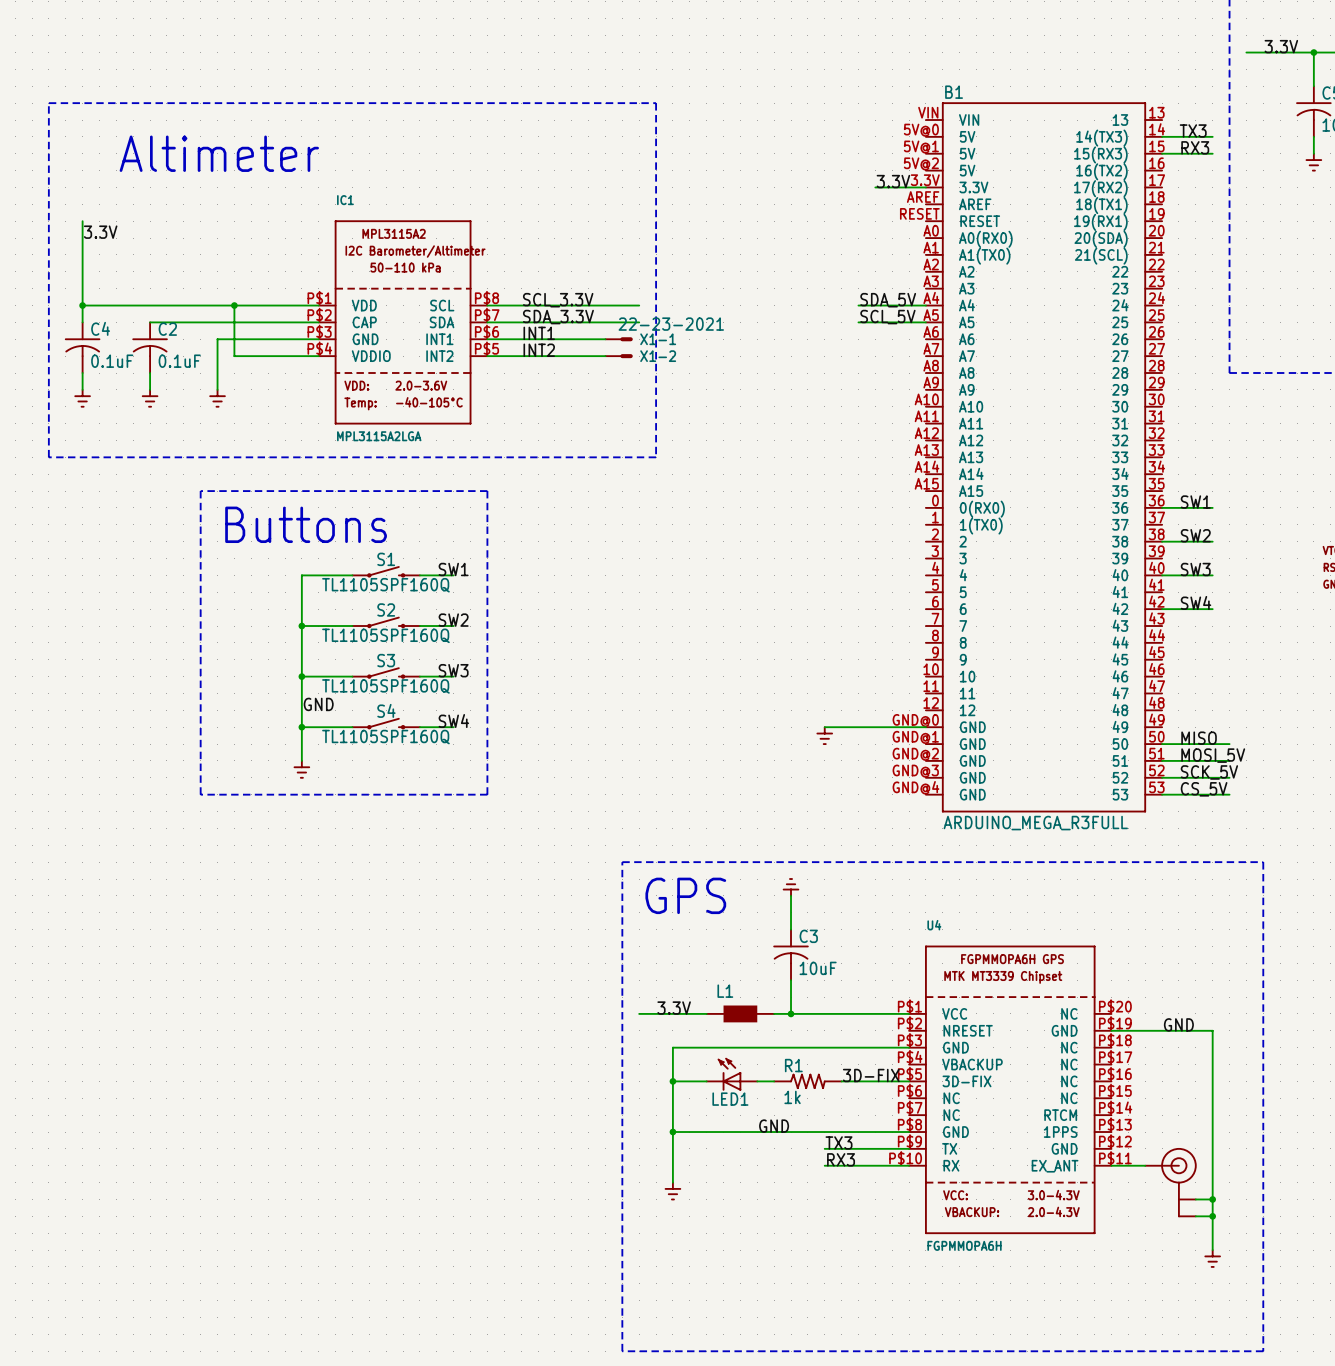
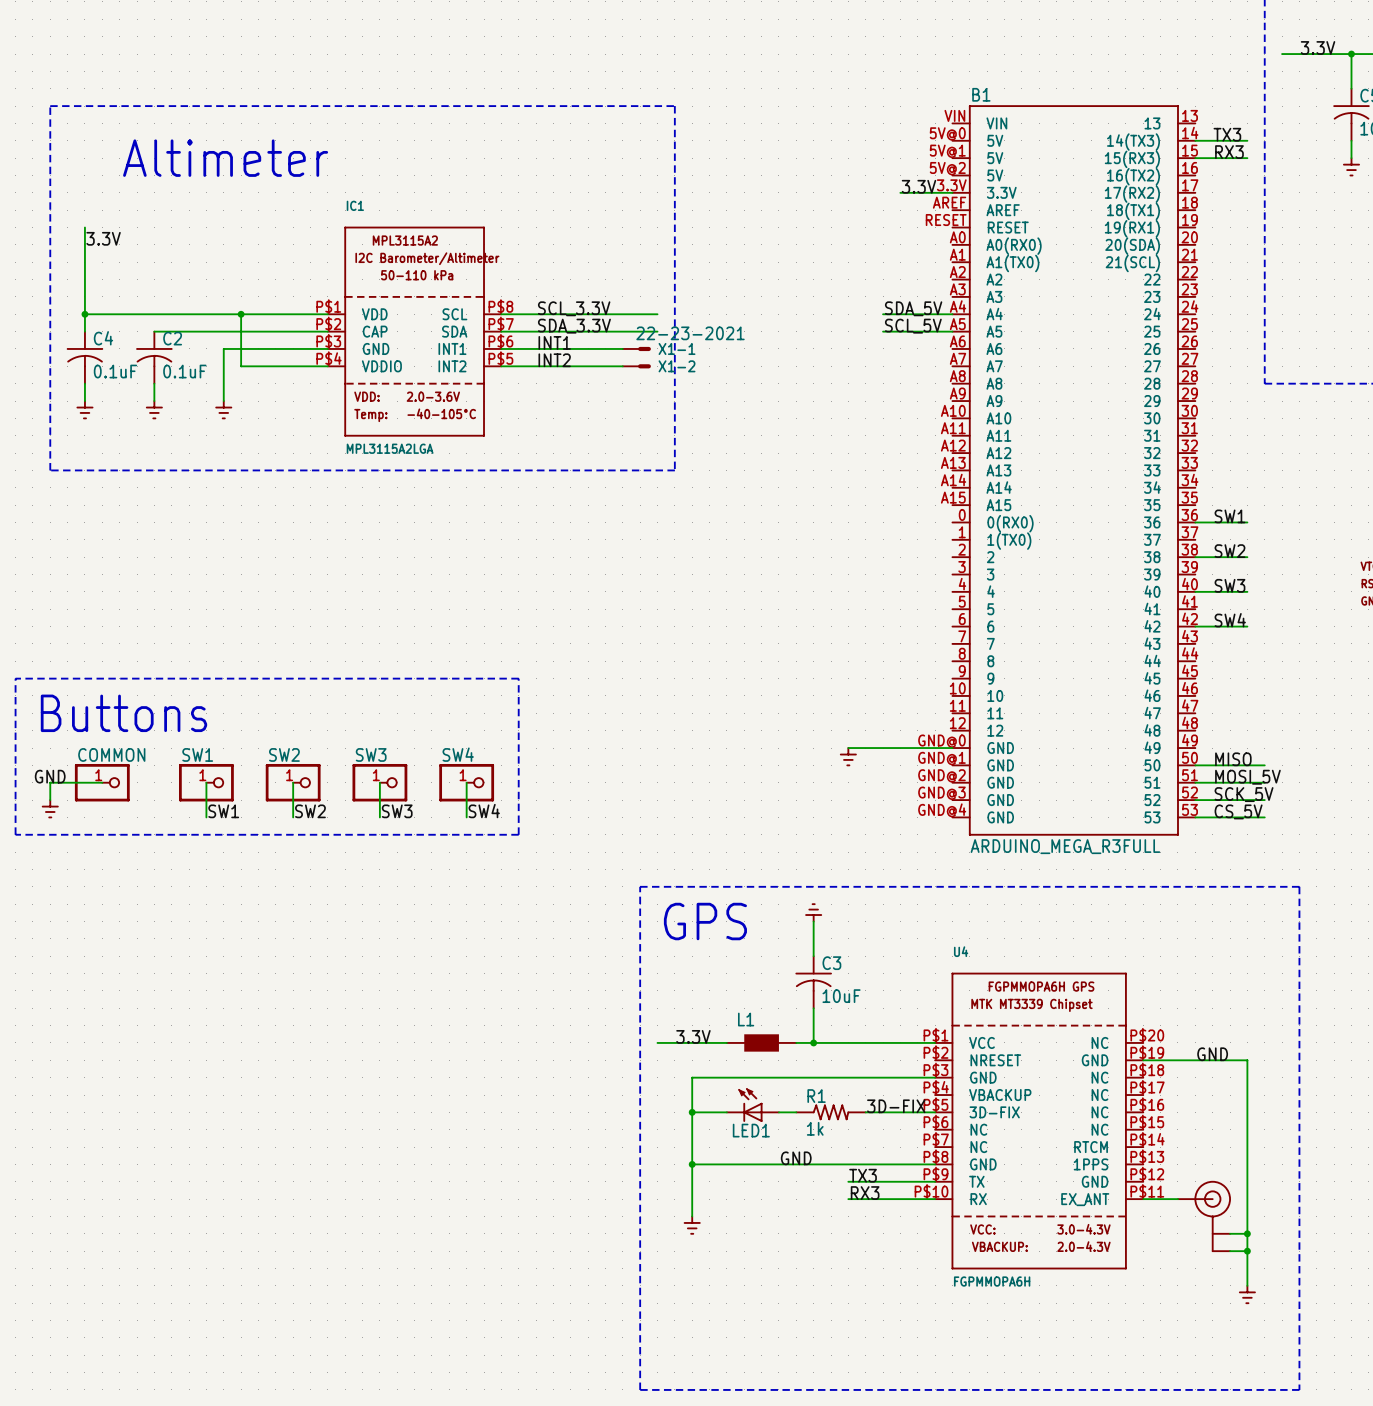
line: (200, 491) (487, 491) (487, 794) (200, 794) (200, 491) -> none
text: Buttons (306, 524) -> none
label: SW1 (453, 569) -> none
S1: TL1105SPF160Q (386, 571) -> none
wire: (352, 575) (301, 575) (301, 760) -> none
wire: (419, 575) (453, 575) -> none
label: SW2 (453, 620) -> none
S2: TL1105SPF160Q (386, 622) -> none
wire: (301, 626) (352, 626) -> none
junction: (301, 626) -> none
wire: (419, 626) (453, 626) -> none
line: none -> (15, 678) (518, 678) (518, 834) (15, 834) (15, 678)
label position: SW3 (453, 670) -> SW3 (397, 811)
S3: TL1105SPF160Q (386, 673) -> none
wire: (301, 676) (352, 676) -> none
junction: (301, 676) -> none
wire: (419, 676) (453, 676) -> none
text: none -> Buttons (123, 713)
label: GND (318, 704) -> none
label position: SW4 (453, 721) -> SW4 (484, 811)
S4: TL1105SPF160Q (386, 723) -> none
wire: (301, 727) (352, 727) -> none
junction: (301, 727) -> none
wire: (419, 727) (453, 727) -> none
label: none -> GND (50, 776)
wire: none -> (102, 782) (50, 782) (50, 800)
COMMON: none -> (102, 782)
SW1: none -> (206, 782)
wire: none -> (293, 782) (293, 817)
SW2: none -> (293, 782)
wire: none -> (379, 782) (379, 817)
SW3: none -> (379, 782)
wire: none -> (466, 782) (466, 817)
SW4: none -> (466, 782)
power symbol: (301, 769) -> none
power symbol: none -> (50, 808)
label: none -> SW1 (223, 811)
label: none -> SW2 (310, 811)

